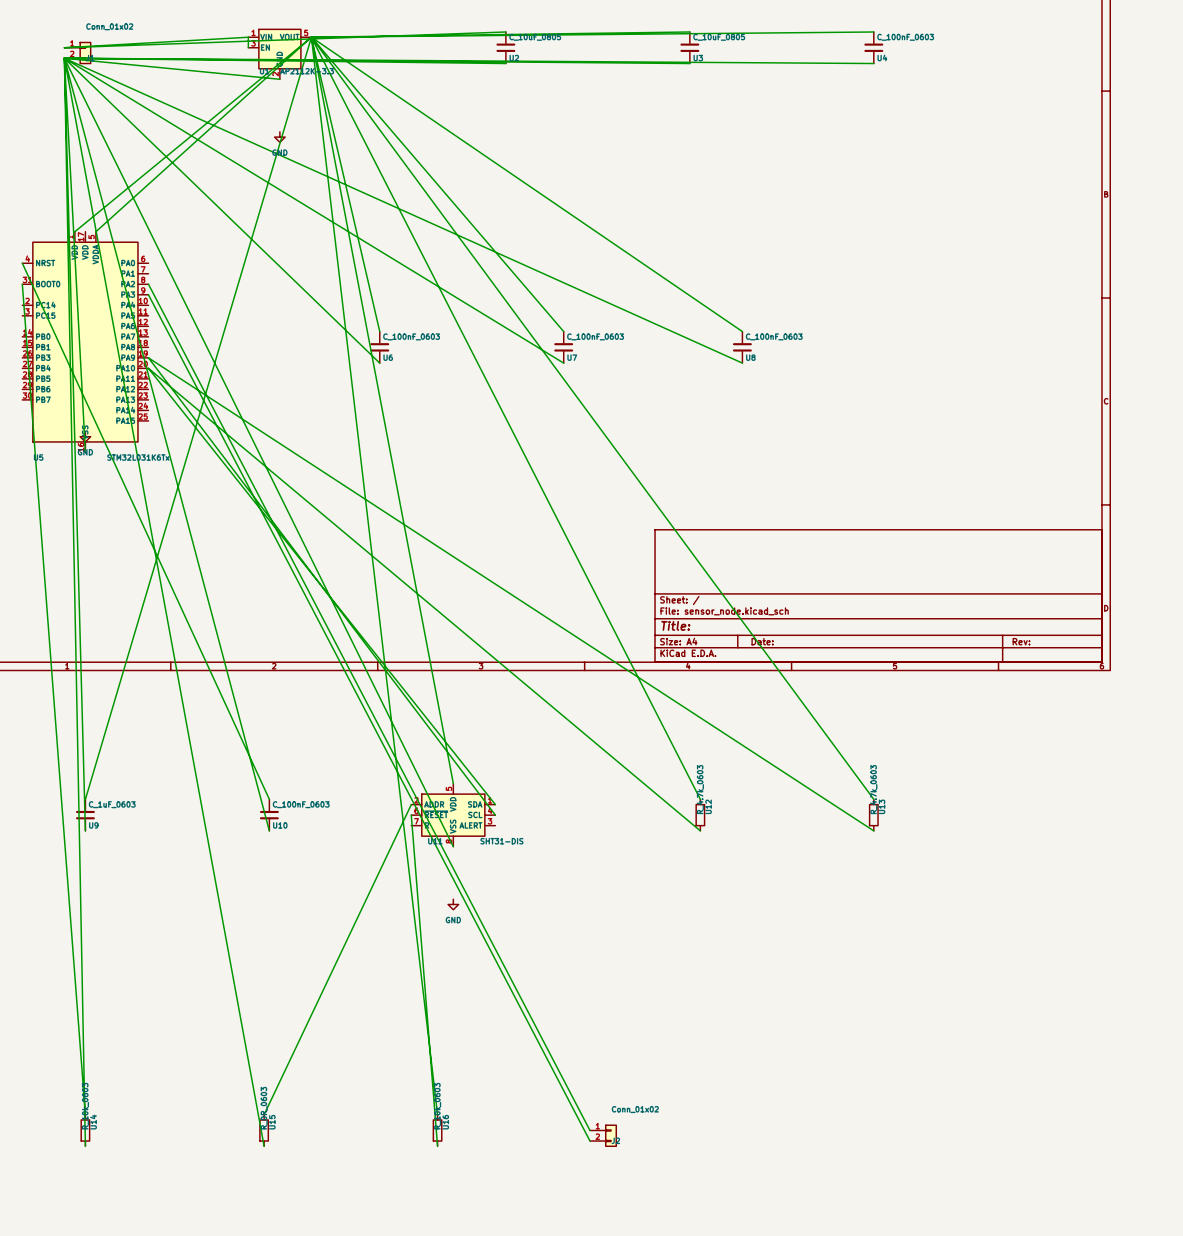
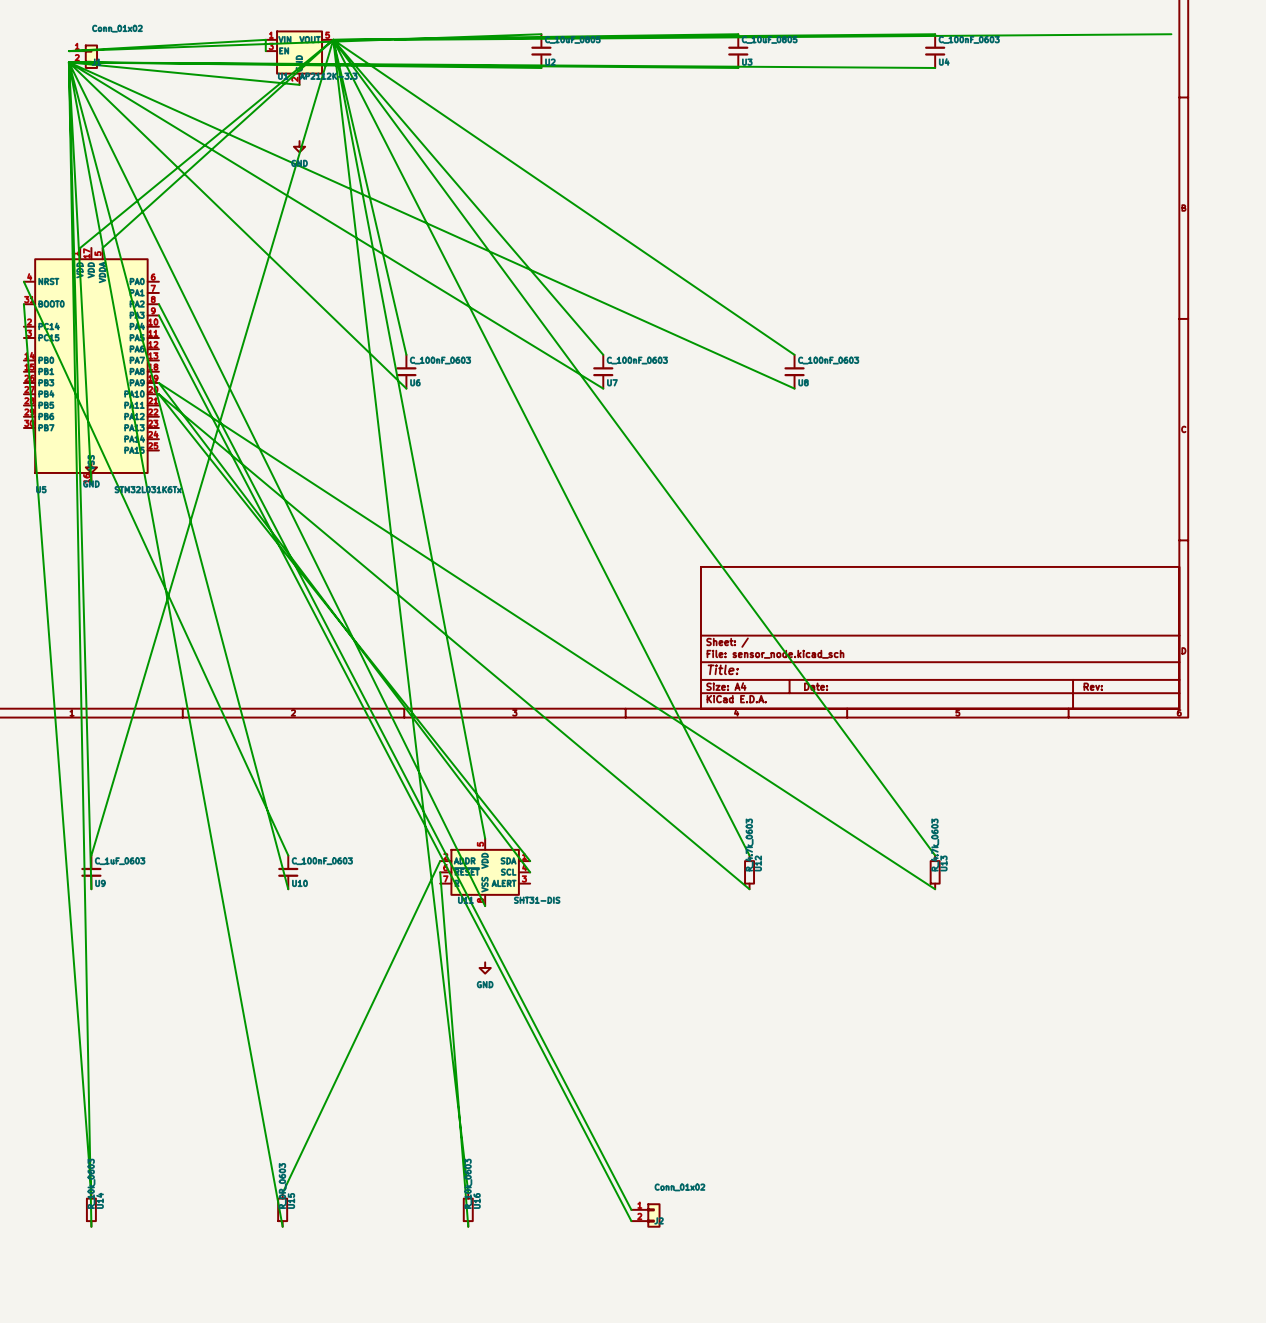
wire: none -> (1171, 34) (395, 39)

